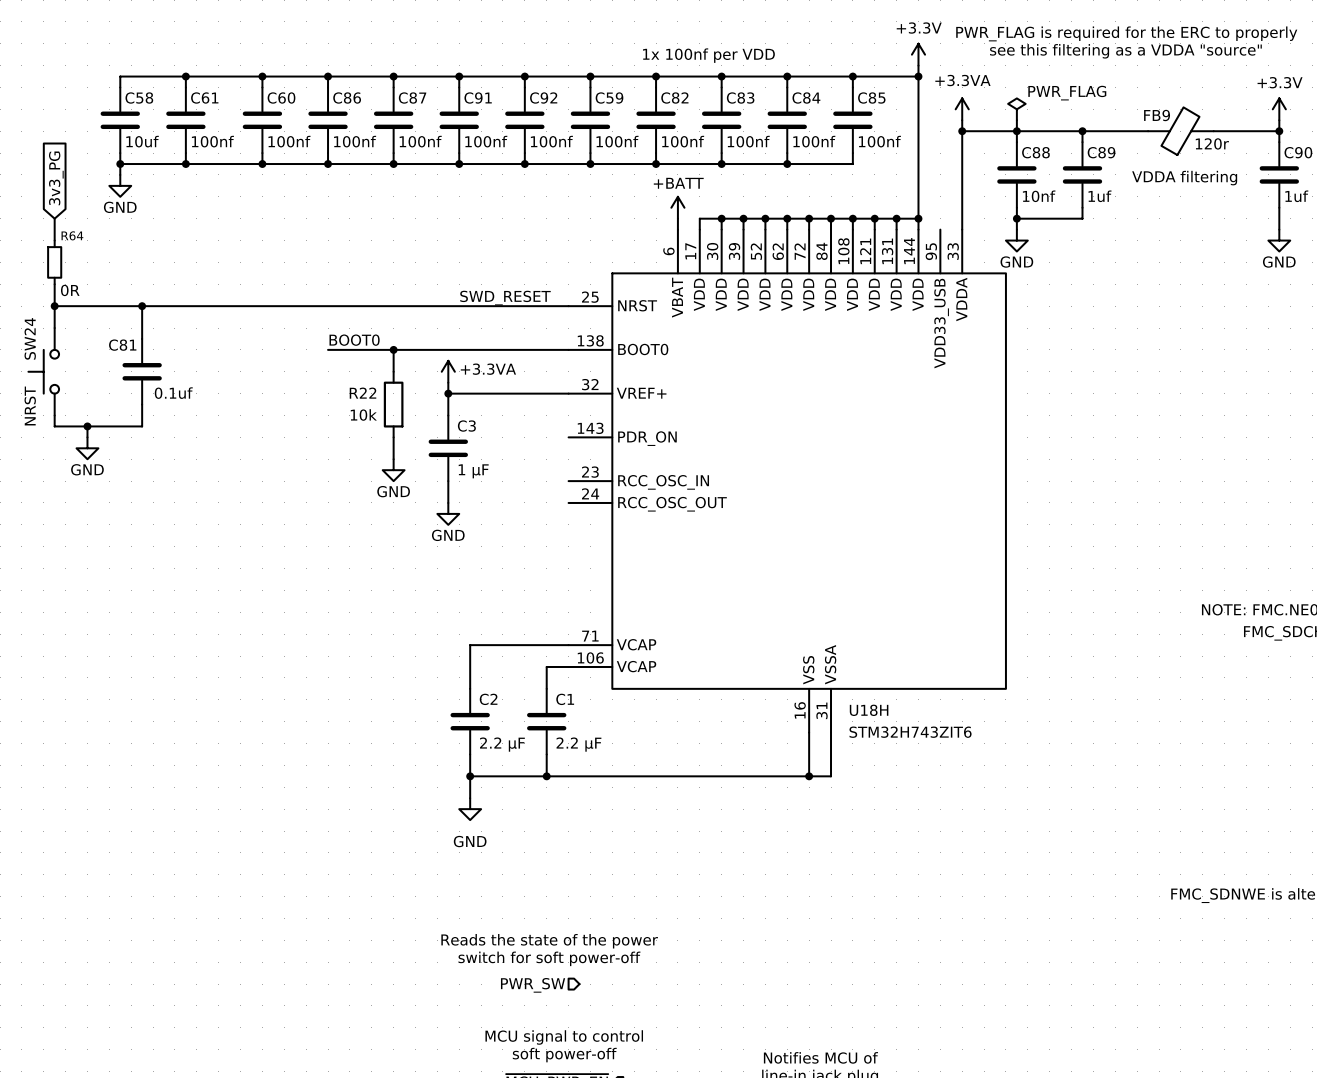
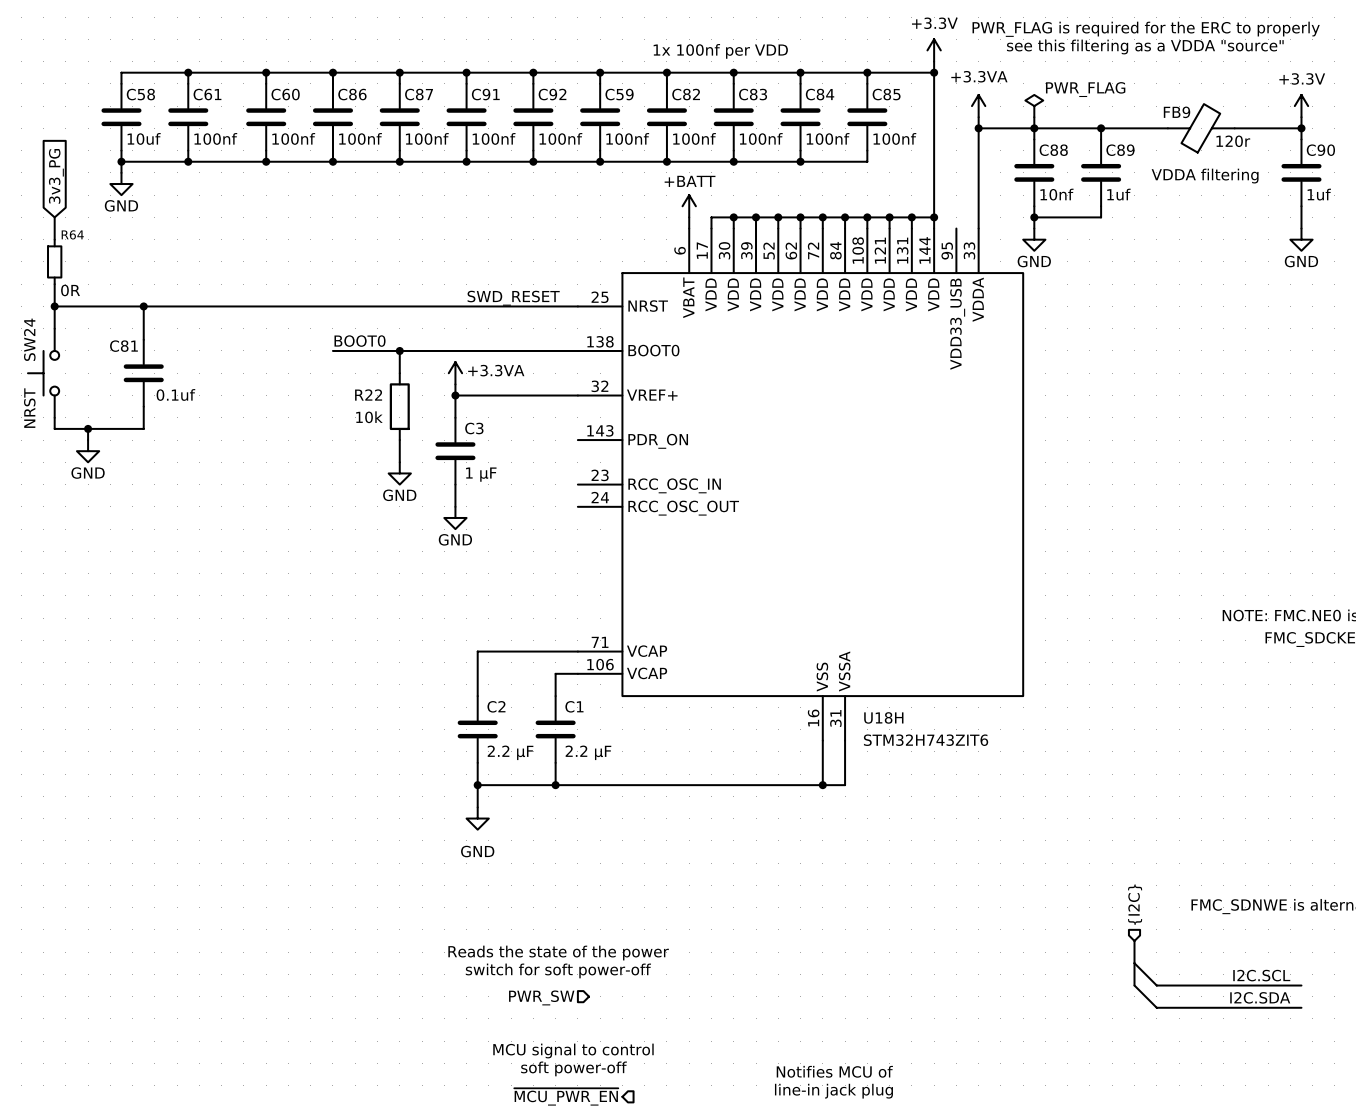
hierarchical label: none -> {I2C} (1135, 904)
bus: none -> (1134, 940) (1134, 985)
wire: none -> (1134, 963) (1156, 985) (1301, 985)
label: none -> I2C.SCL (1261, 975)
wire: none -> (1134, 985) (1156, 1007) (1301, 1007)
label: none -> I2C.SDA (1260, 997)

